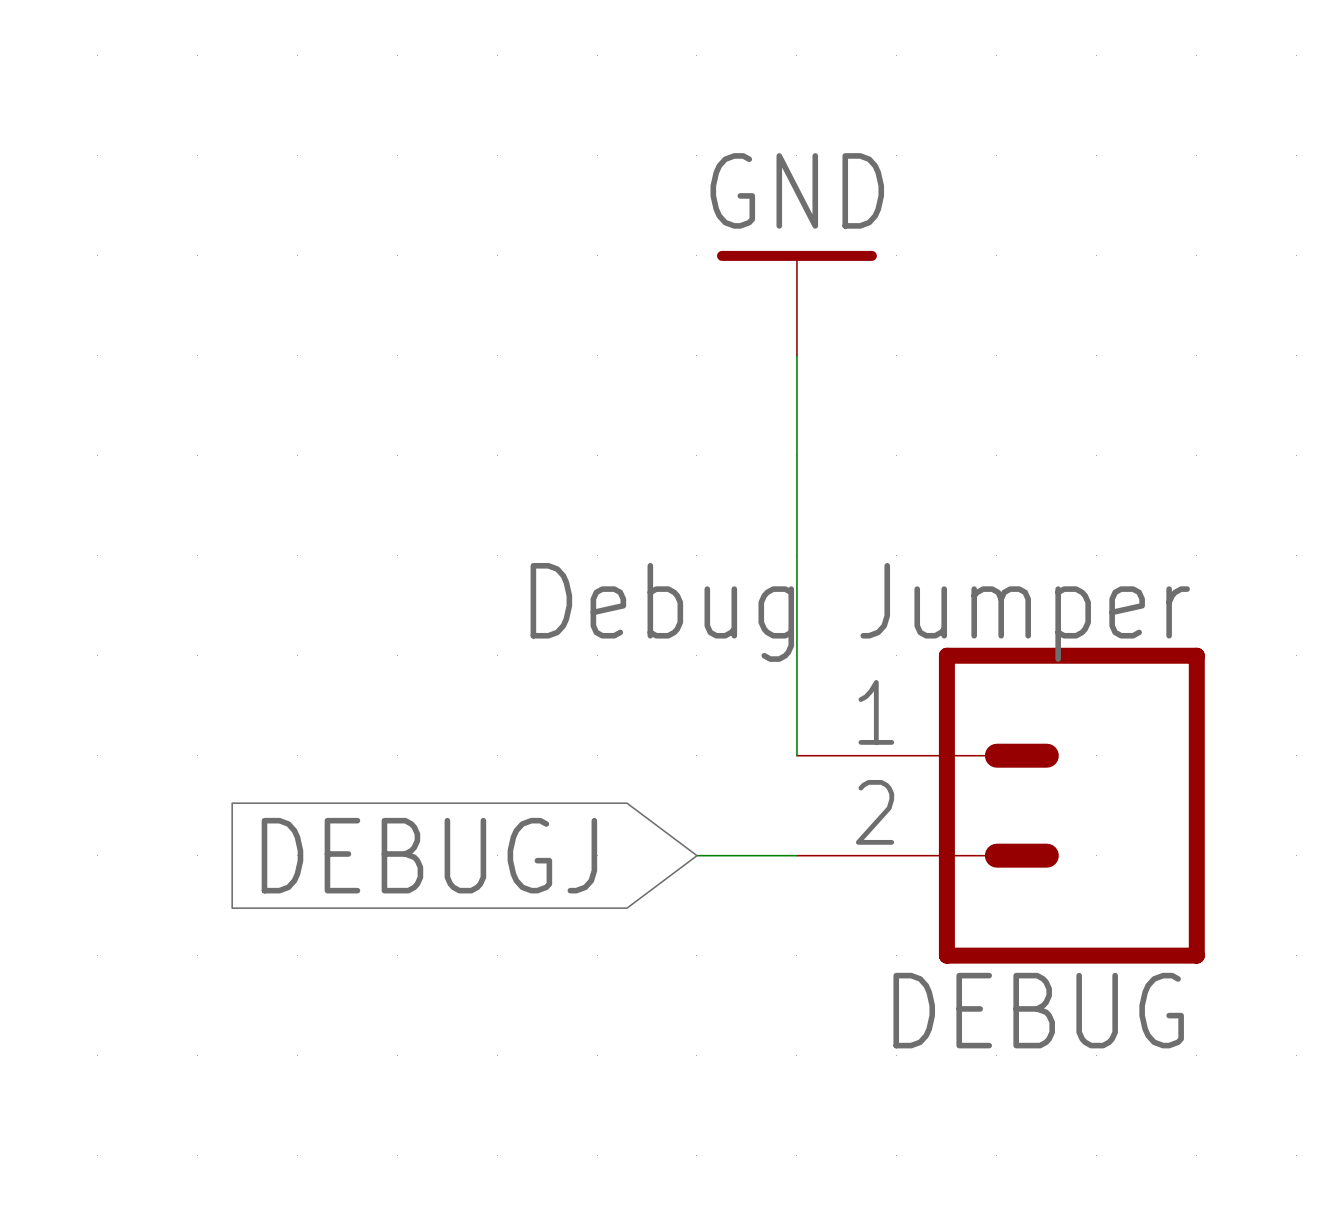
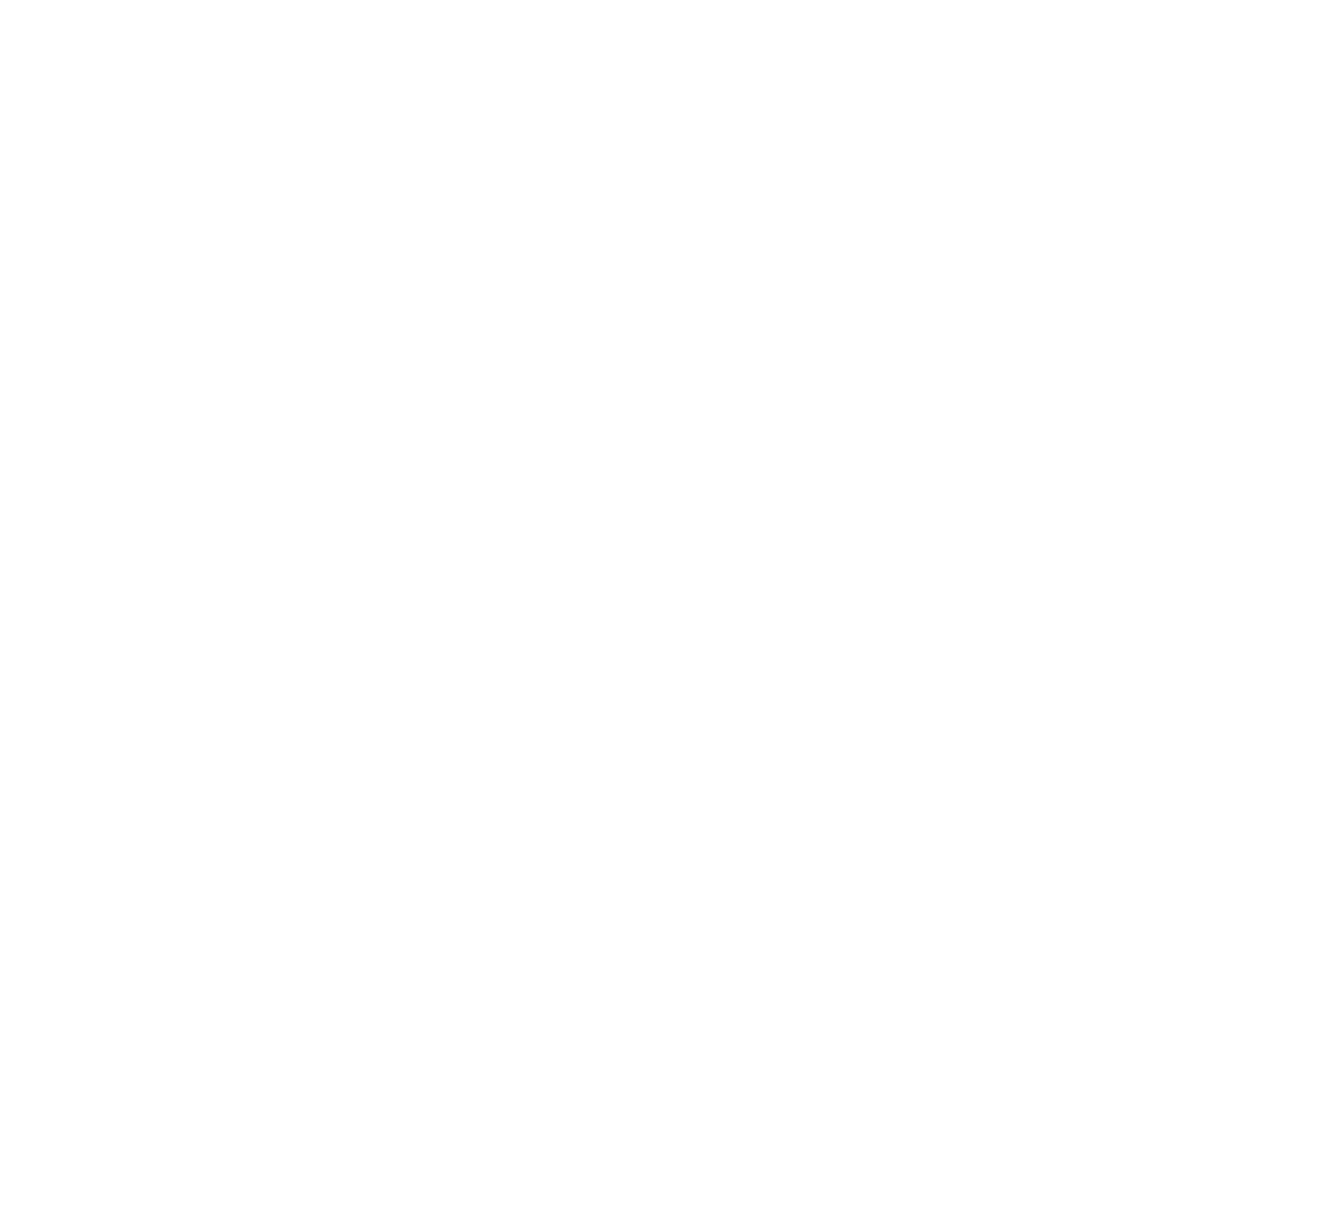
power symbol: GND (796, 303) -> none
wire: (796, 355) (796, 755) -> none
DEBUG: Debug Jumper (1000, 805) -> none
global label: DEBUGJ (429, 855) -> none
wire: (696, 855) (796, 855) -> none

